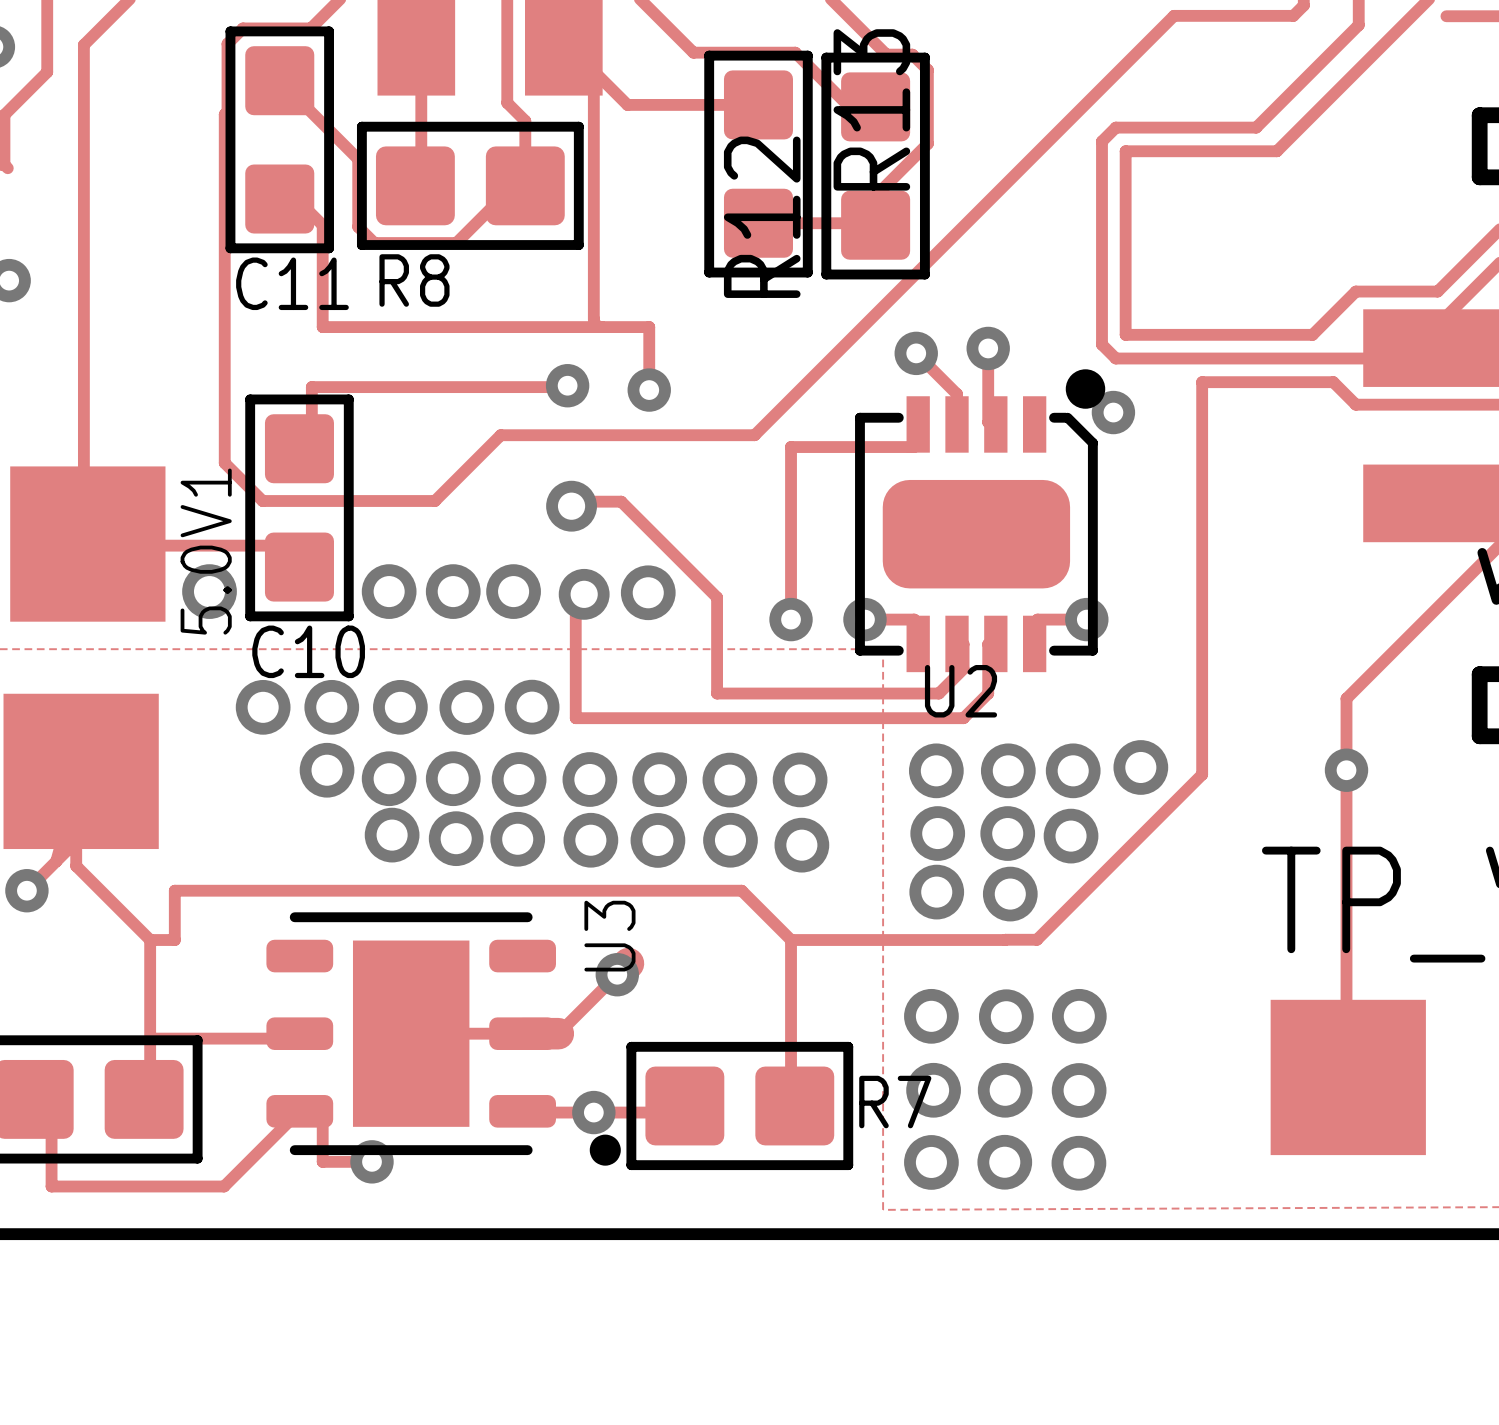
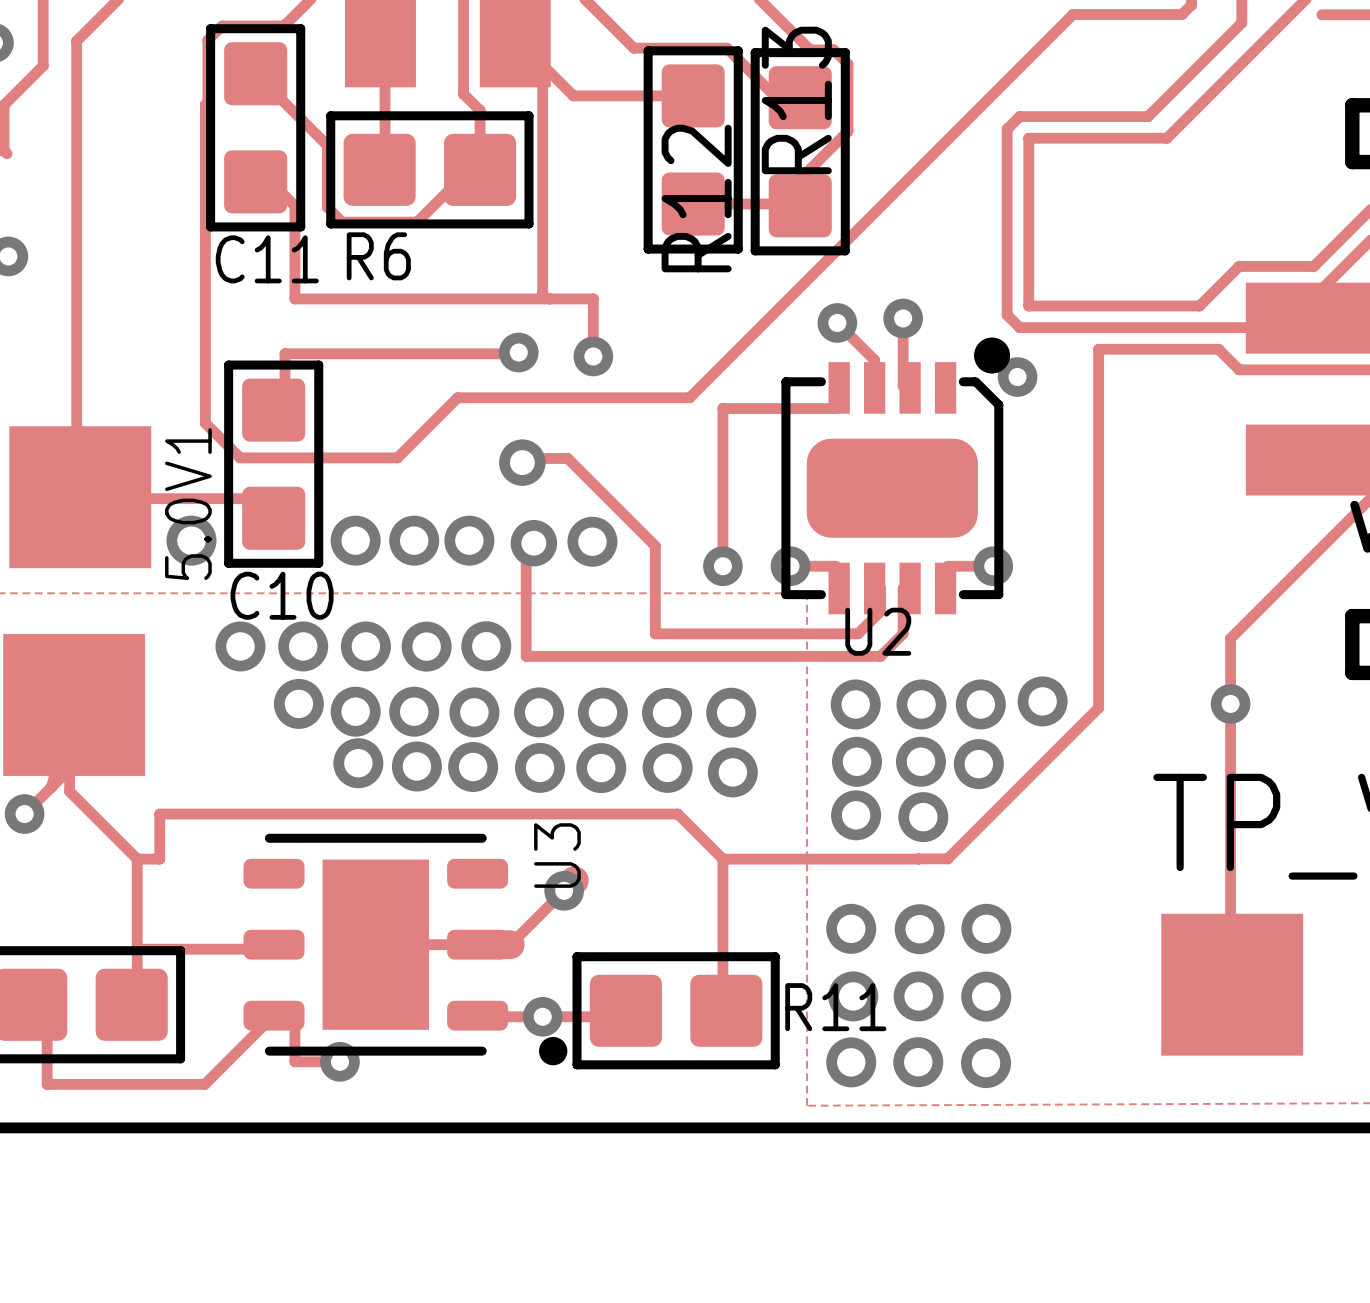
R8 name: R8 (414, 280) -> R6 (378, 256)
R7 name: R7 (895, 1102) -> R11 (835, 1007)

